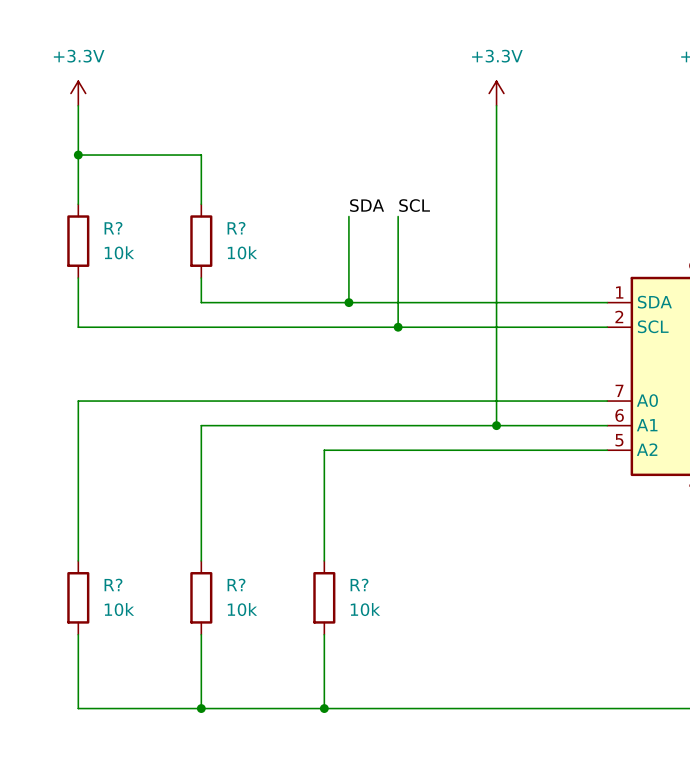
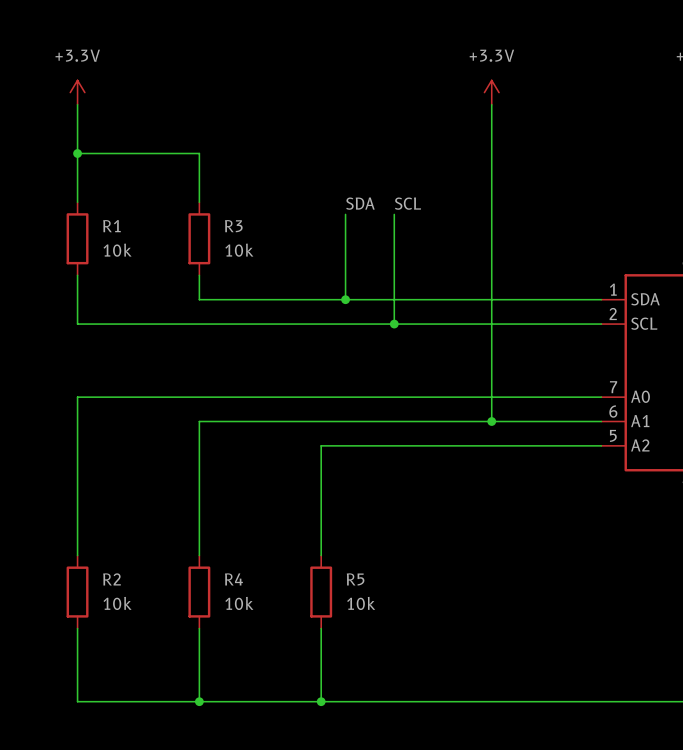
R? name: R? (113, 228) -> R1 (111, 226)
R? name: R? (236, 228) -> R3 (233, 226)
R? name: R? (113, 584) -> R2 (111, 579)
R? name: R? (236, 584) -> R4 (233, 579)
R? name: R? (359, 584) -> R5 (355, 579)

